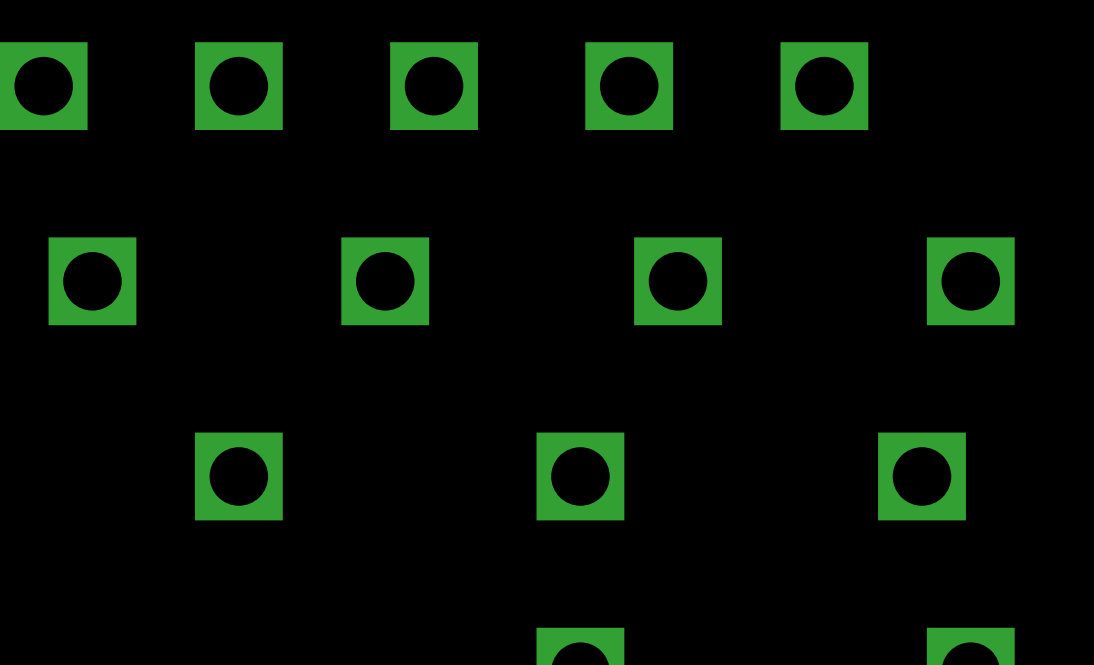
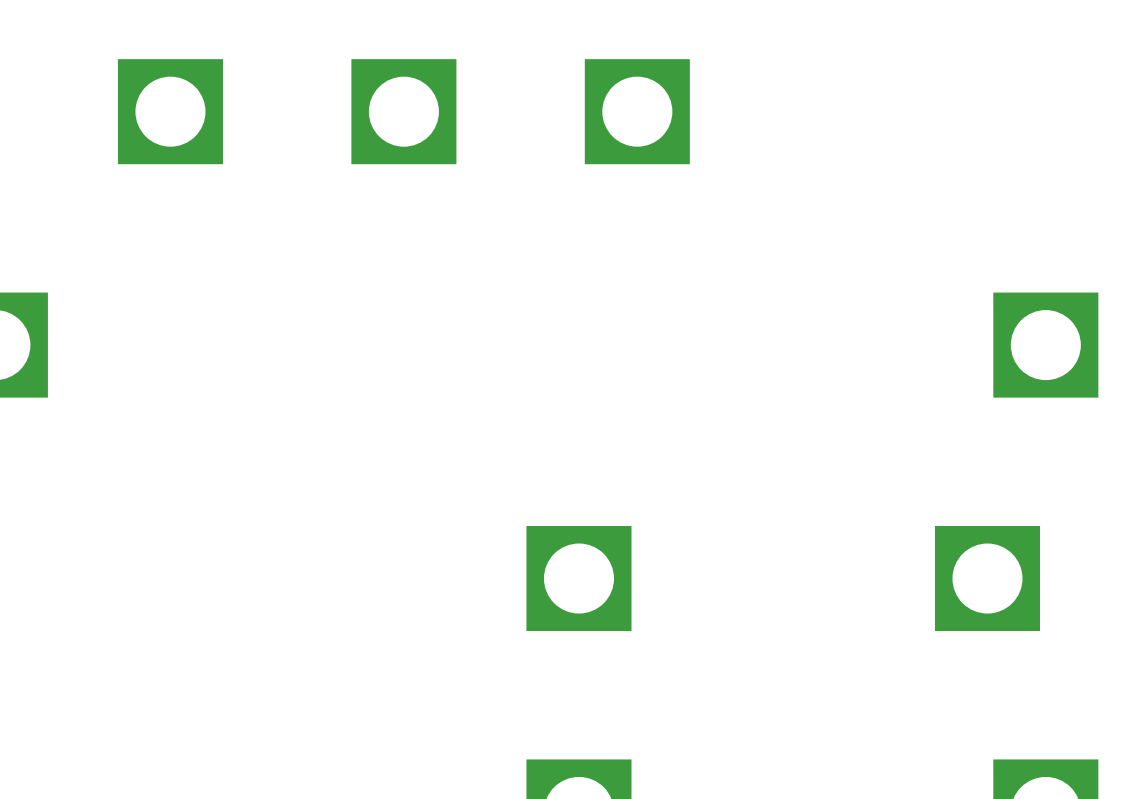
part: (824, 86) -> none
part: (385, 281) -> none
part: (678, 281) -> none
part: (238, 476) -> none

